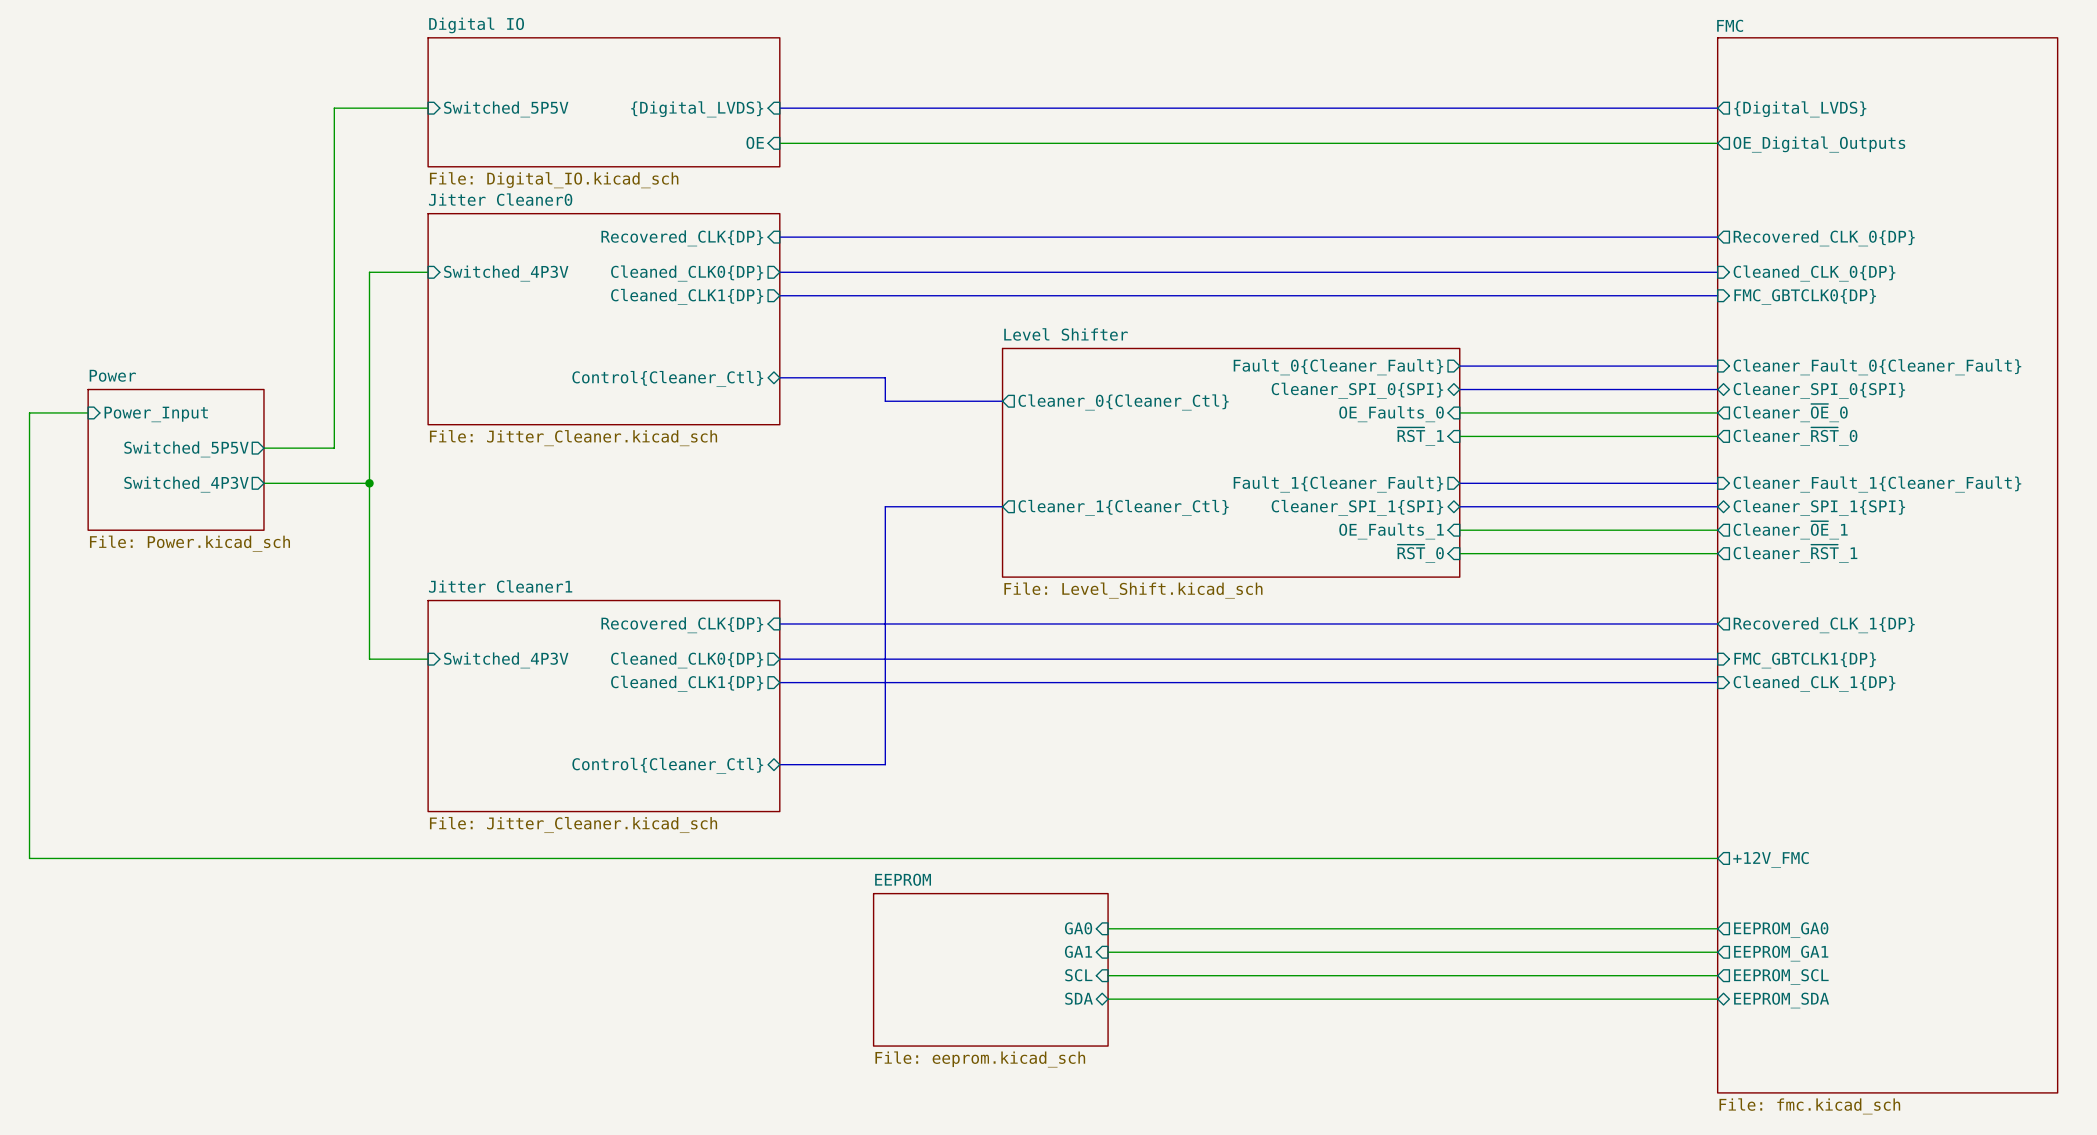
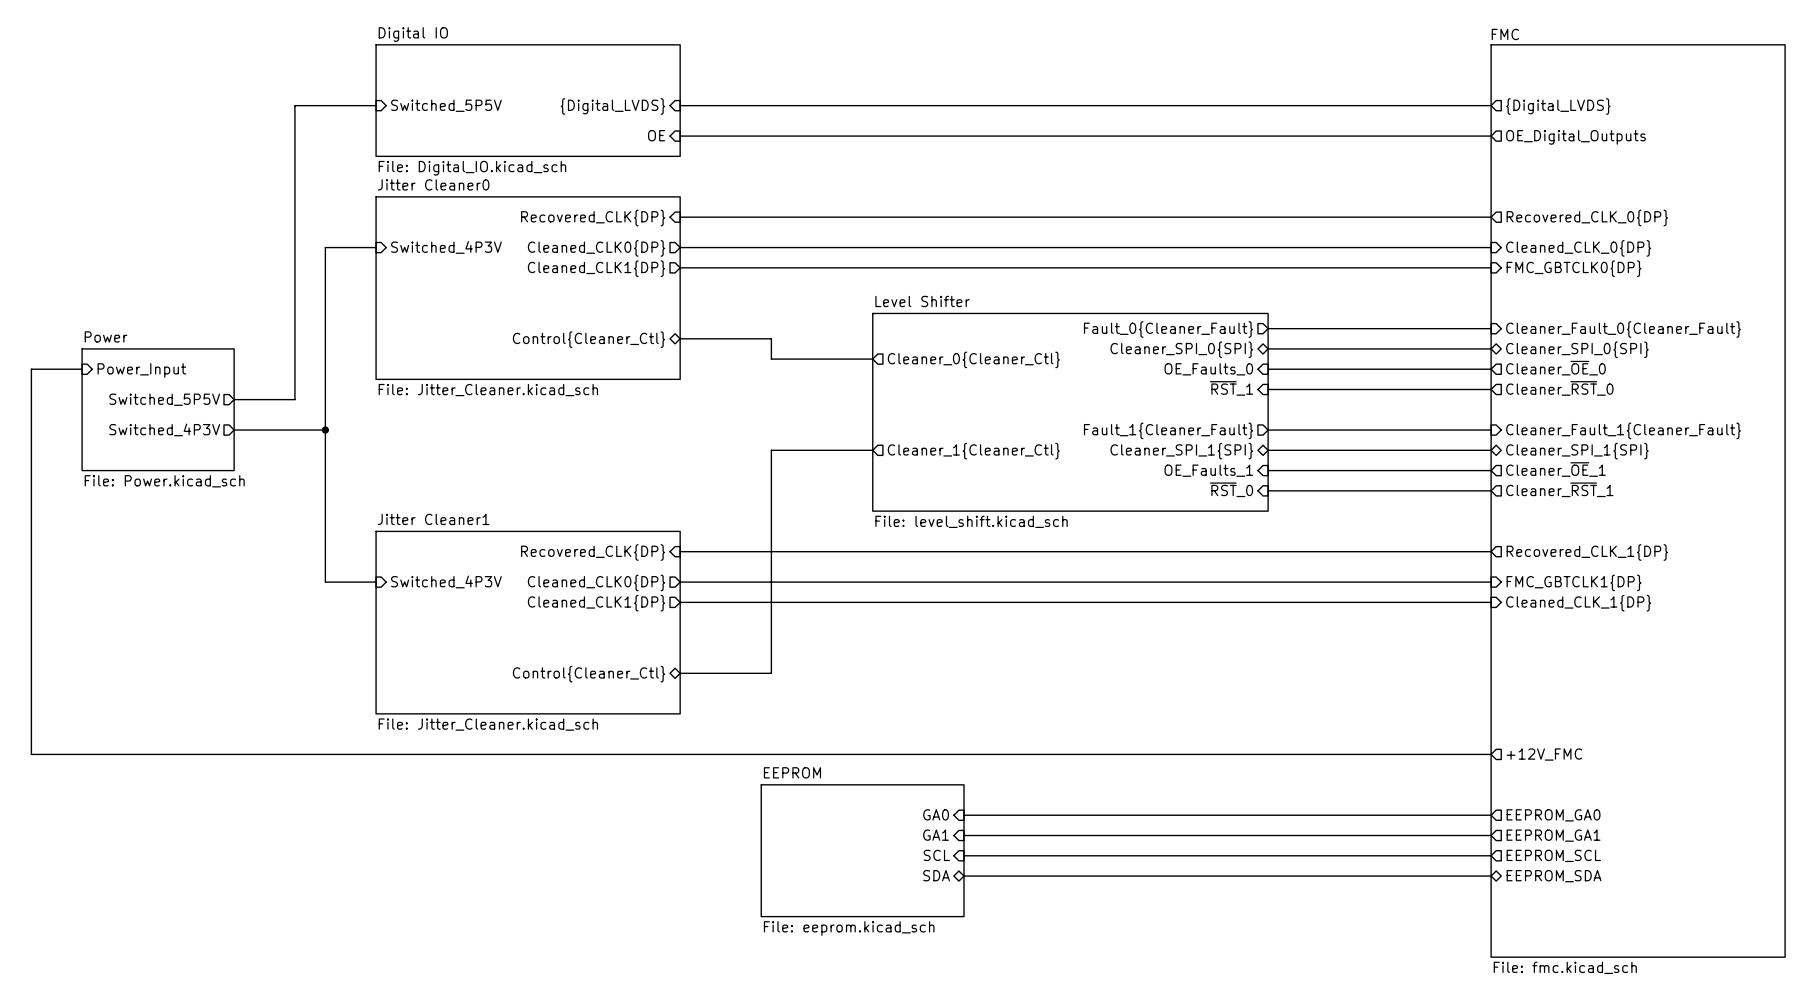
sheet Level Shifter value: File: Level_Shift.kicad_sch (1133, 590) -> File: level_shift.kicad_sch (971, 521)

